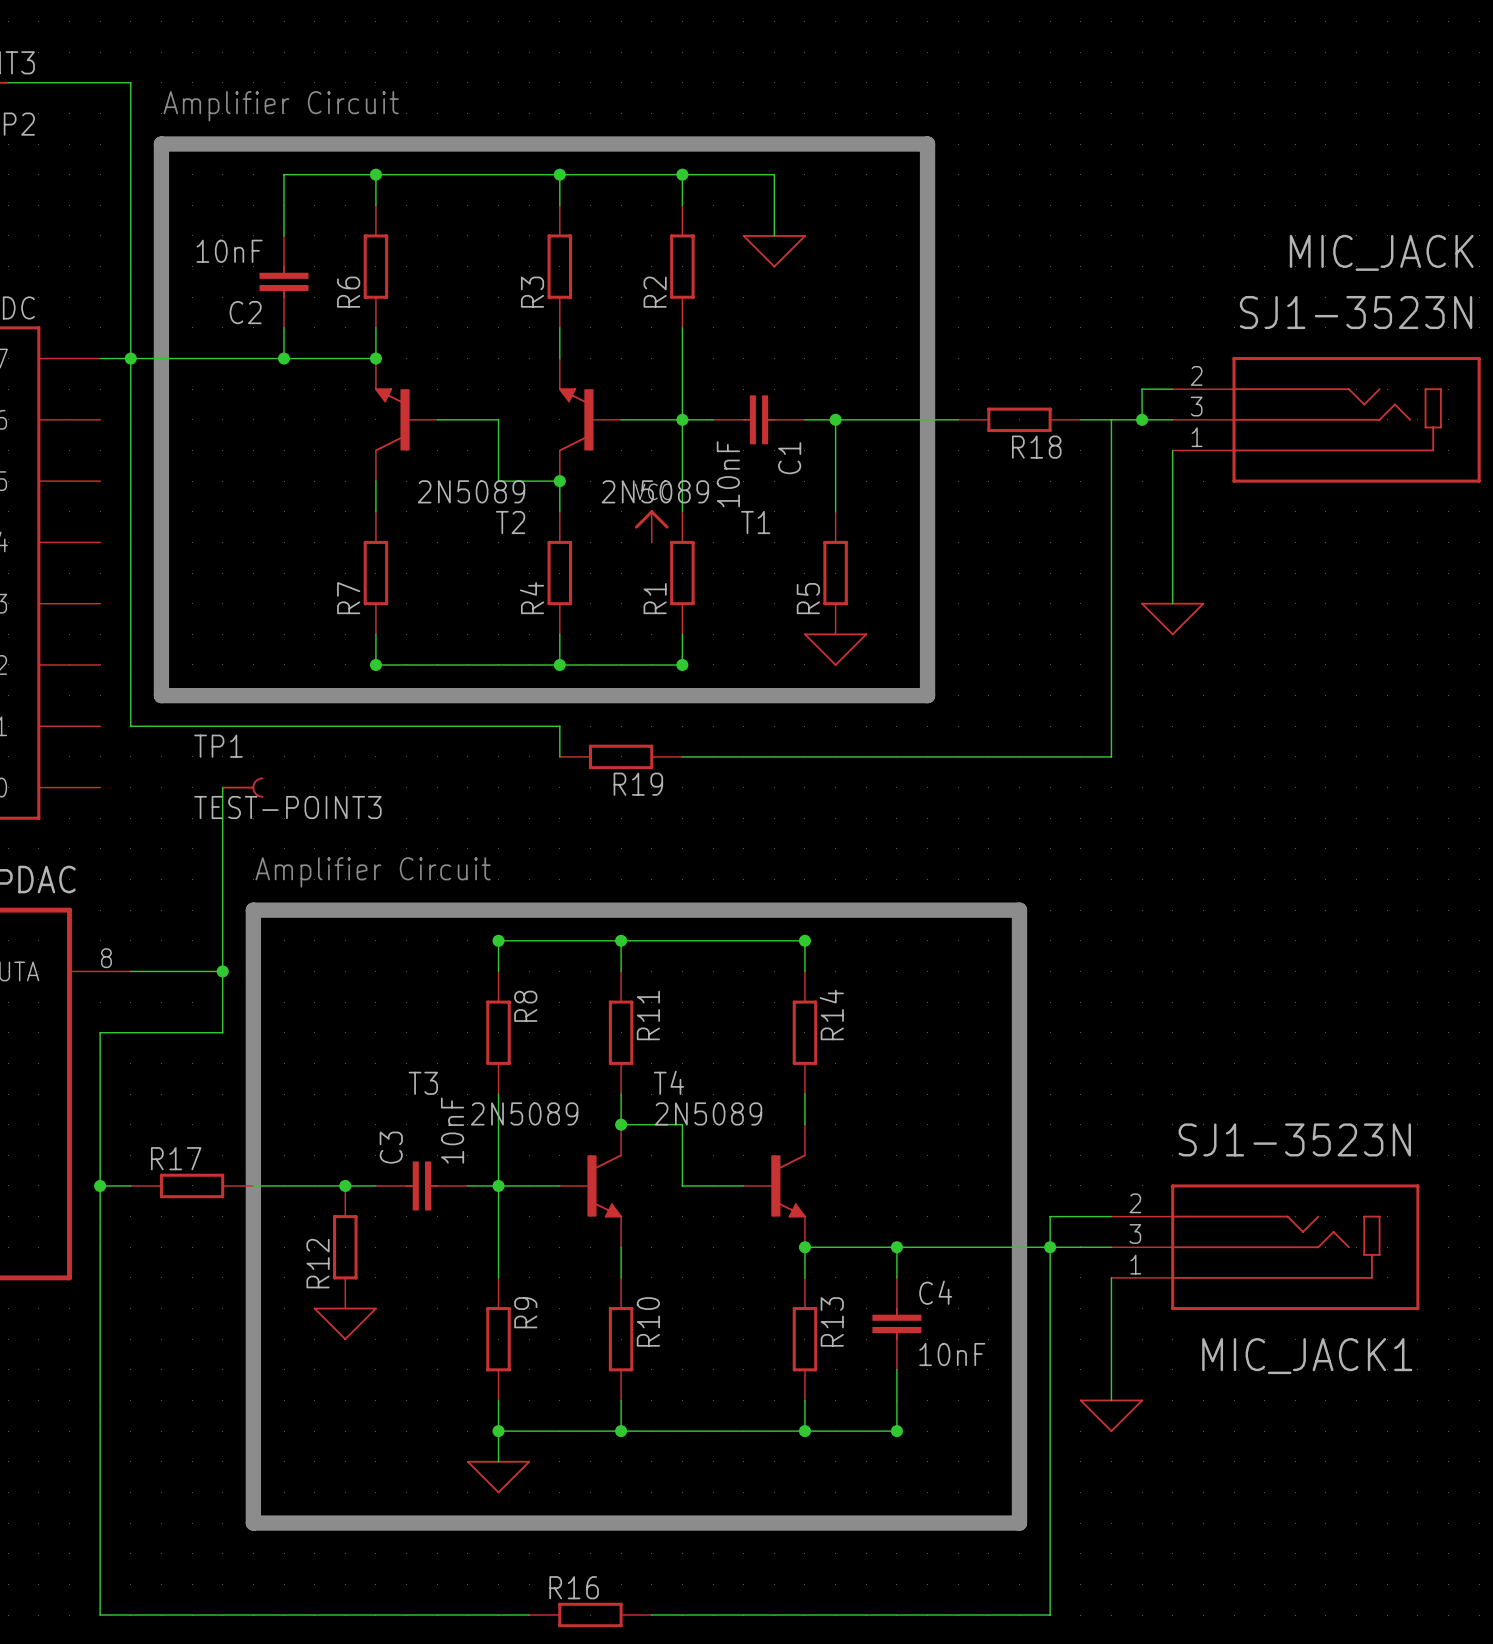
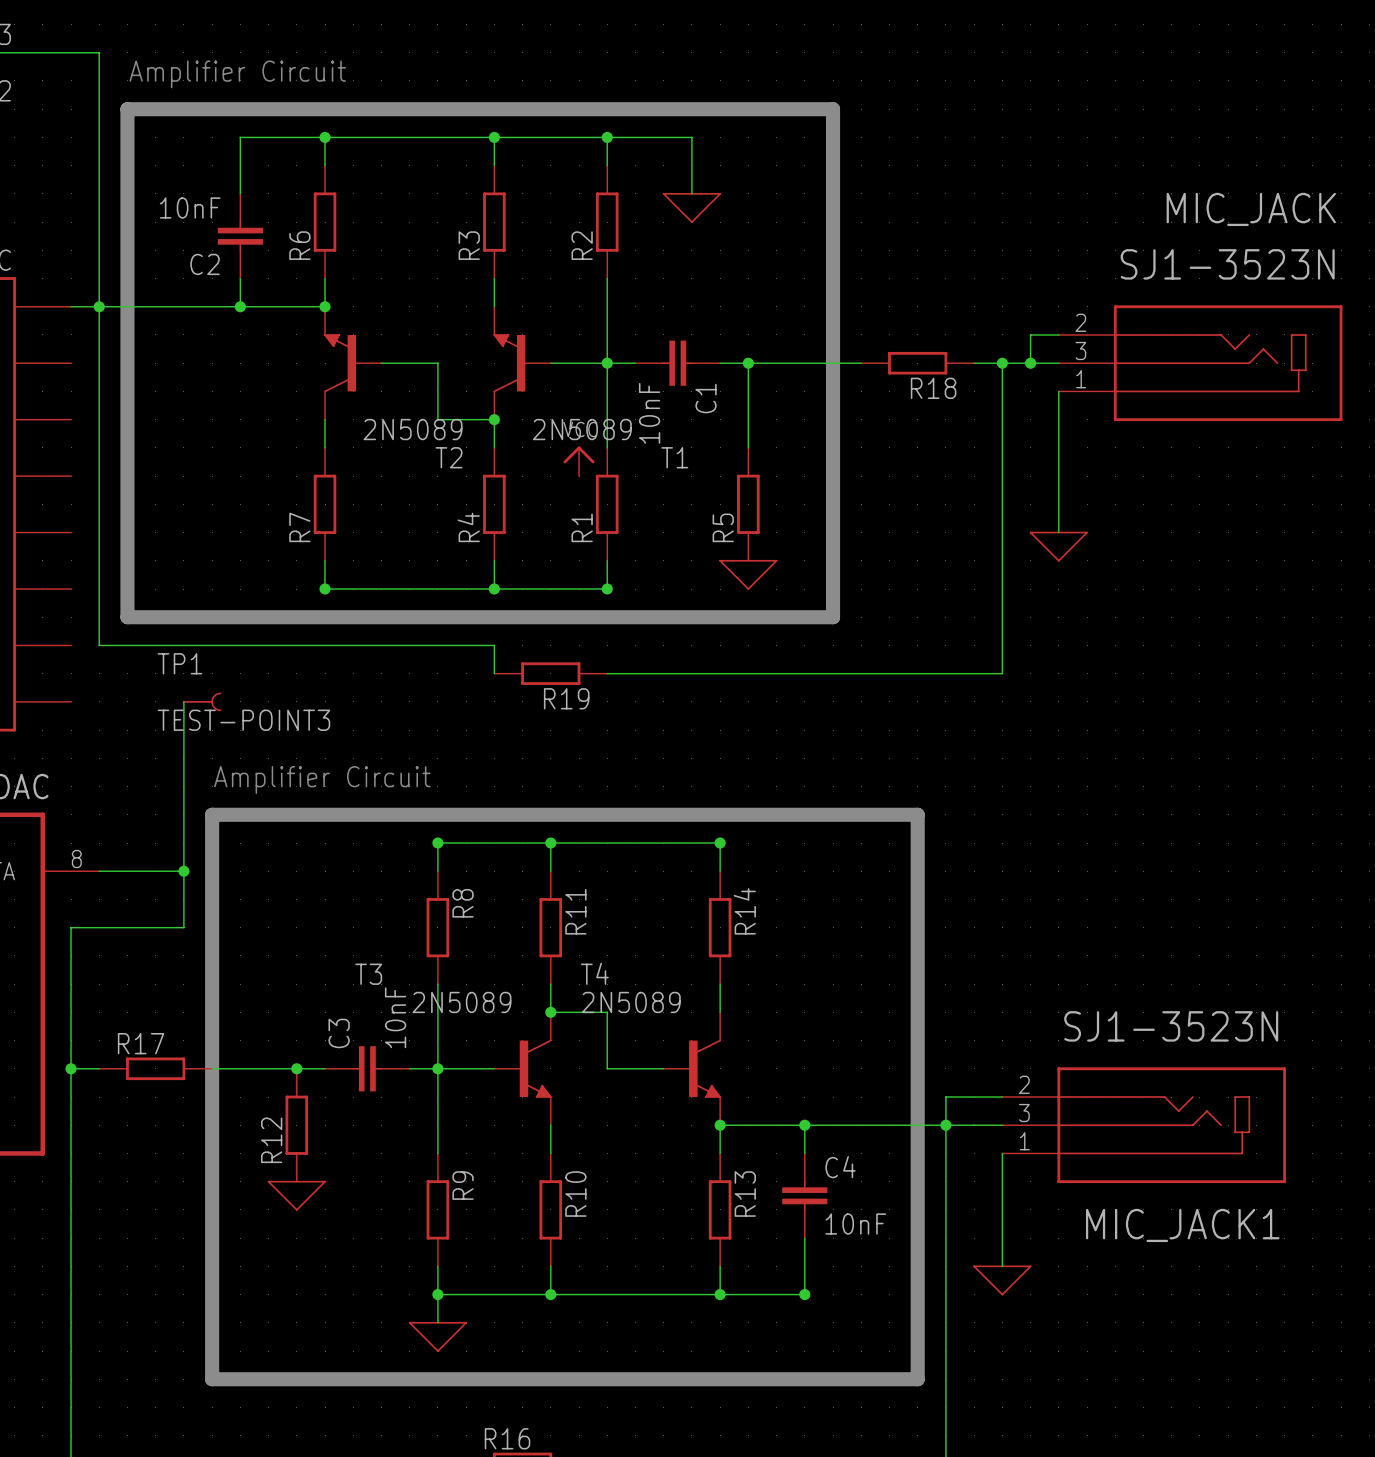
junction: none -> (1002, 363)

